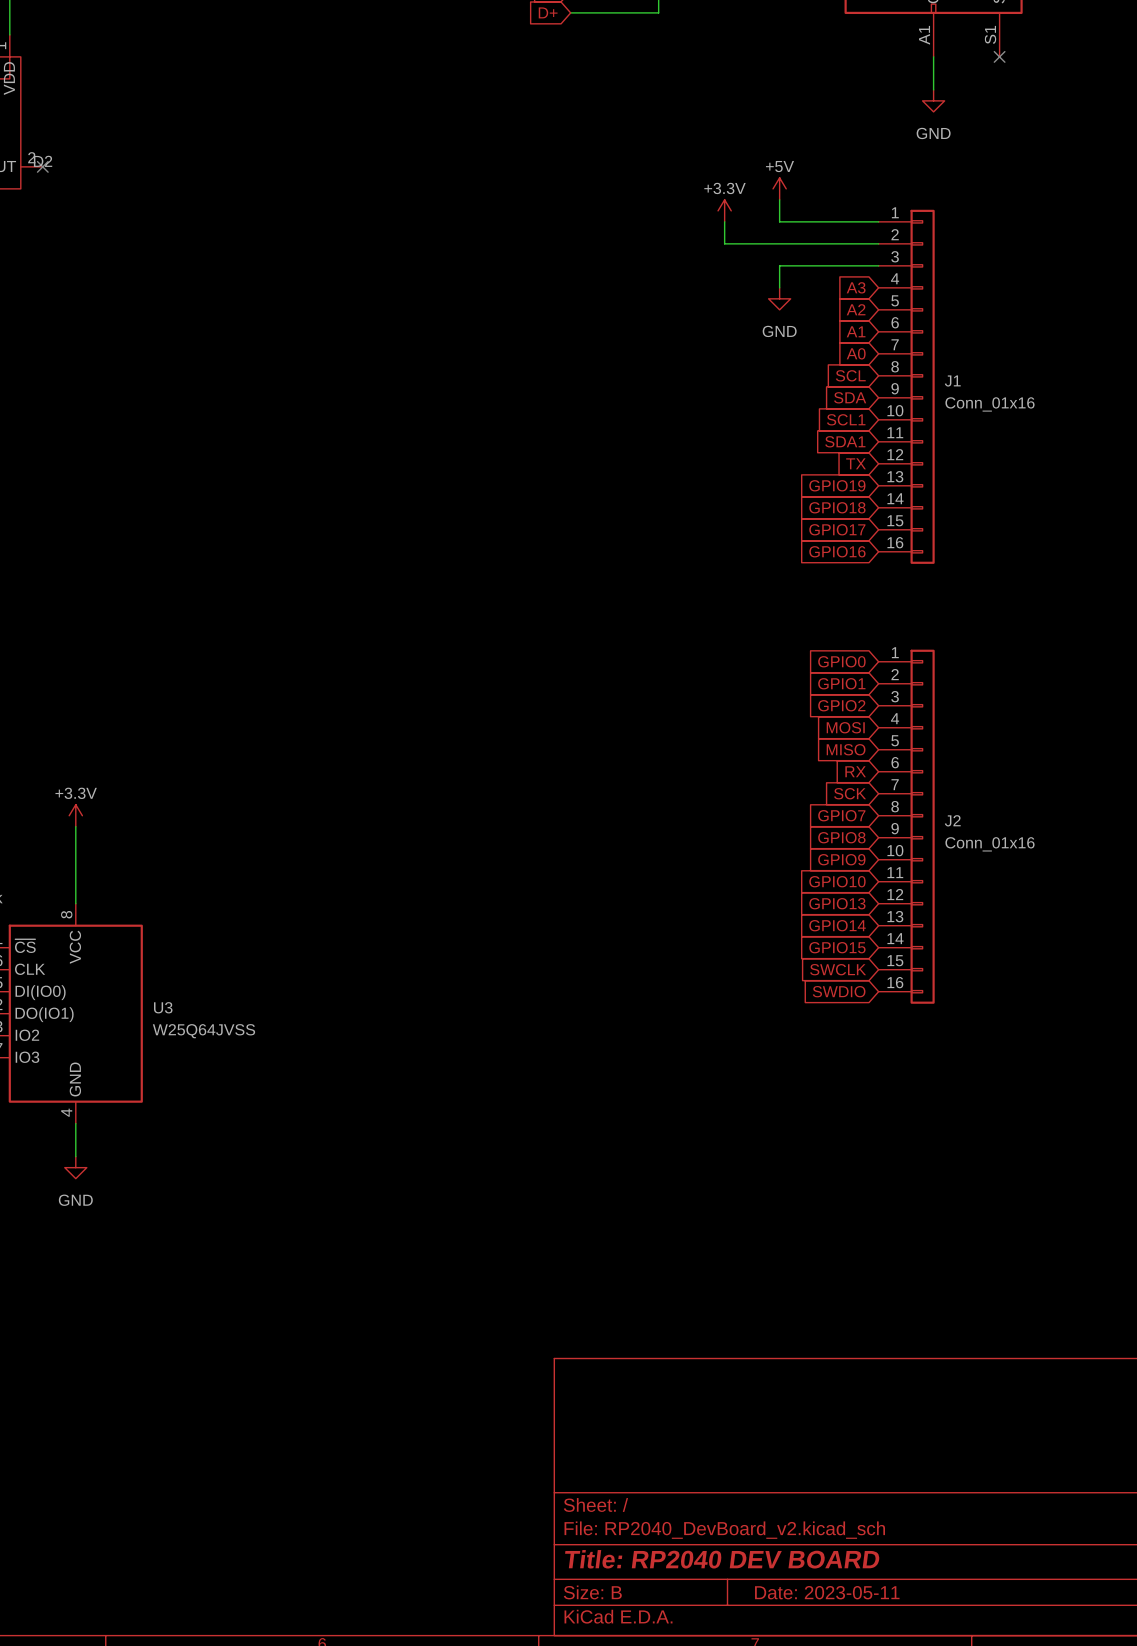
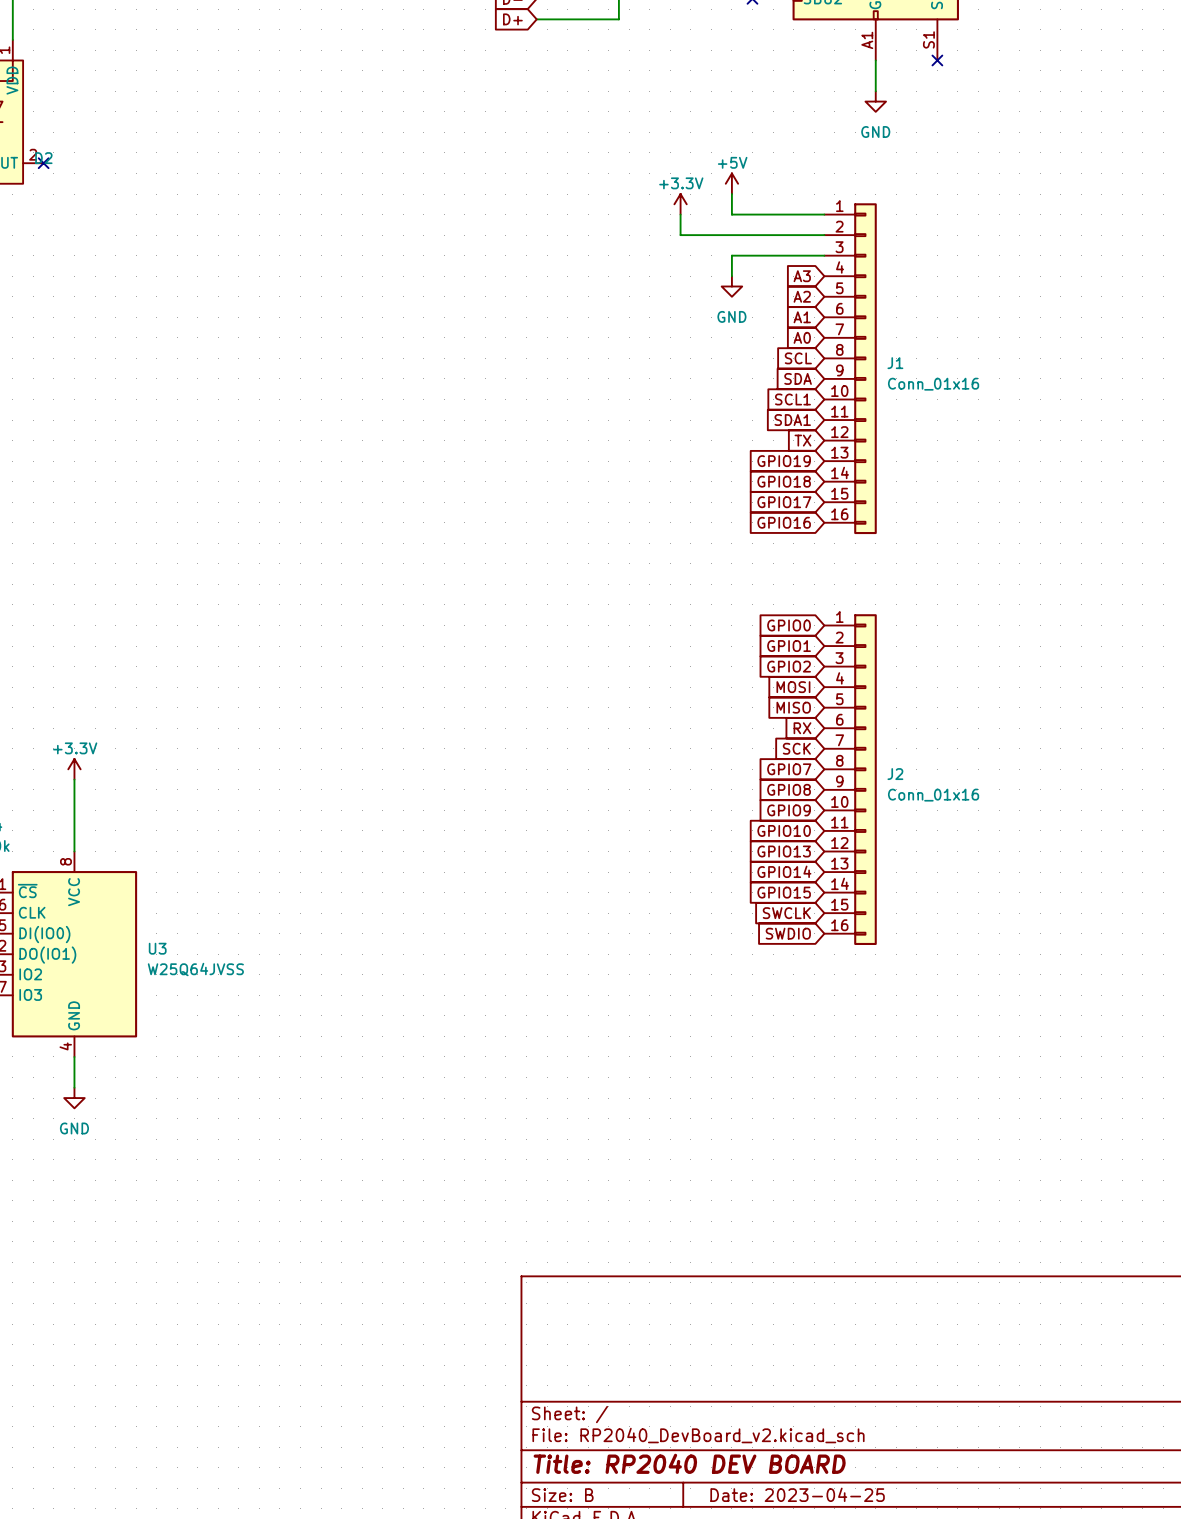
title block: Date: 2023-05-11 (827, 1592) -> Date: 2023-04-25 (797, 1494)

